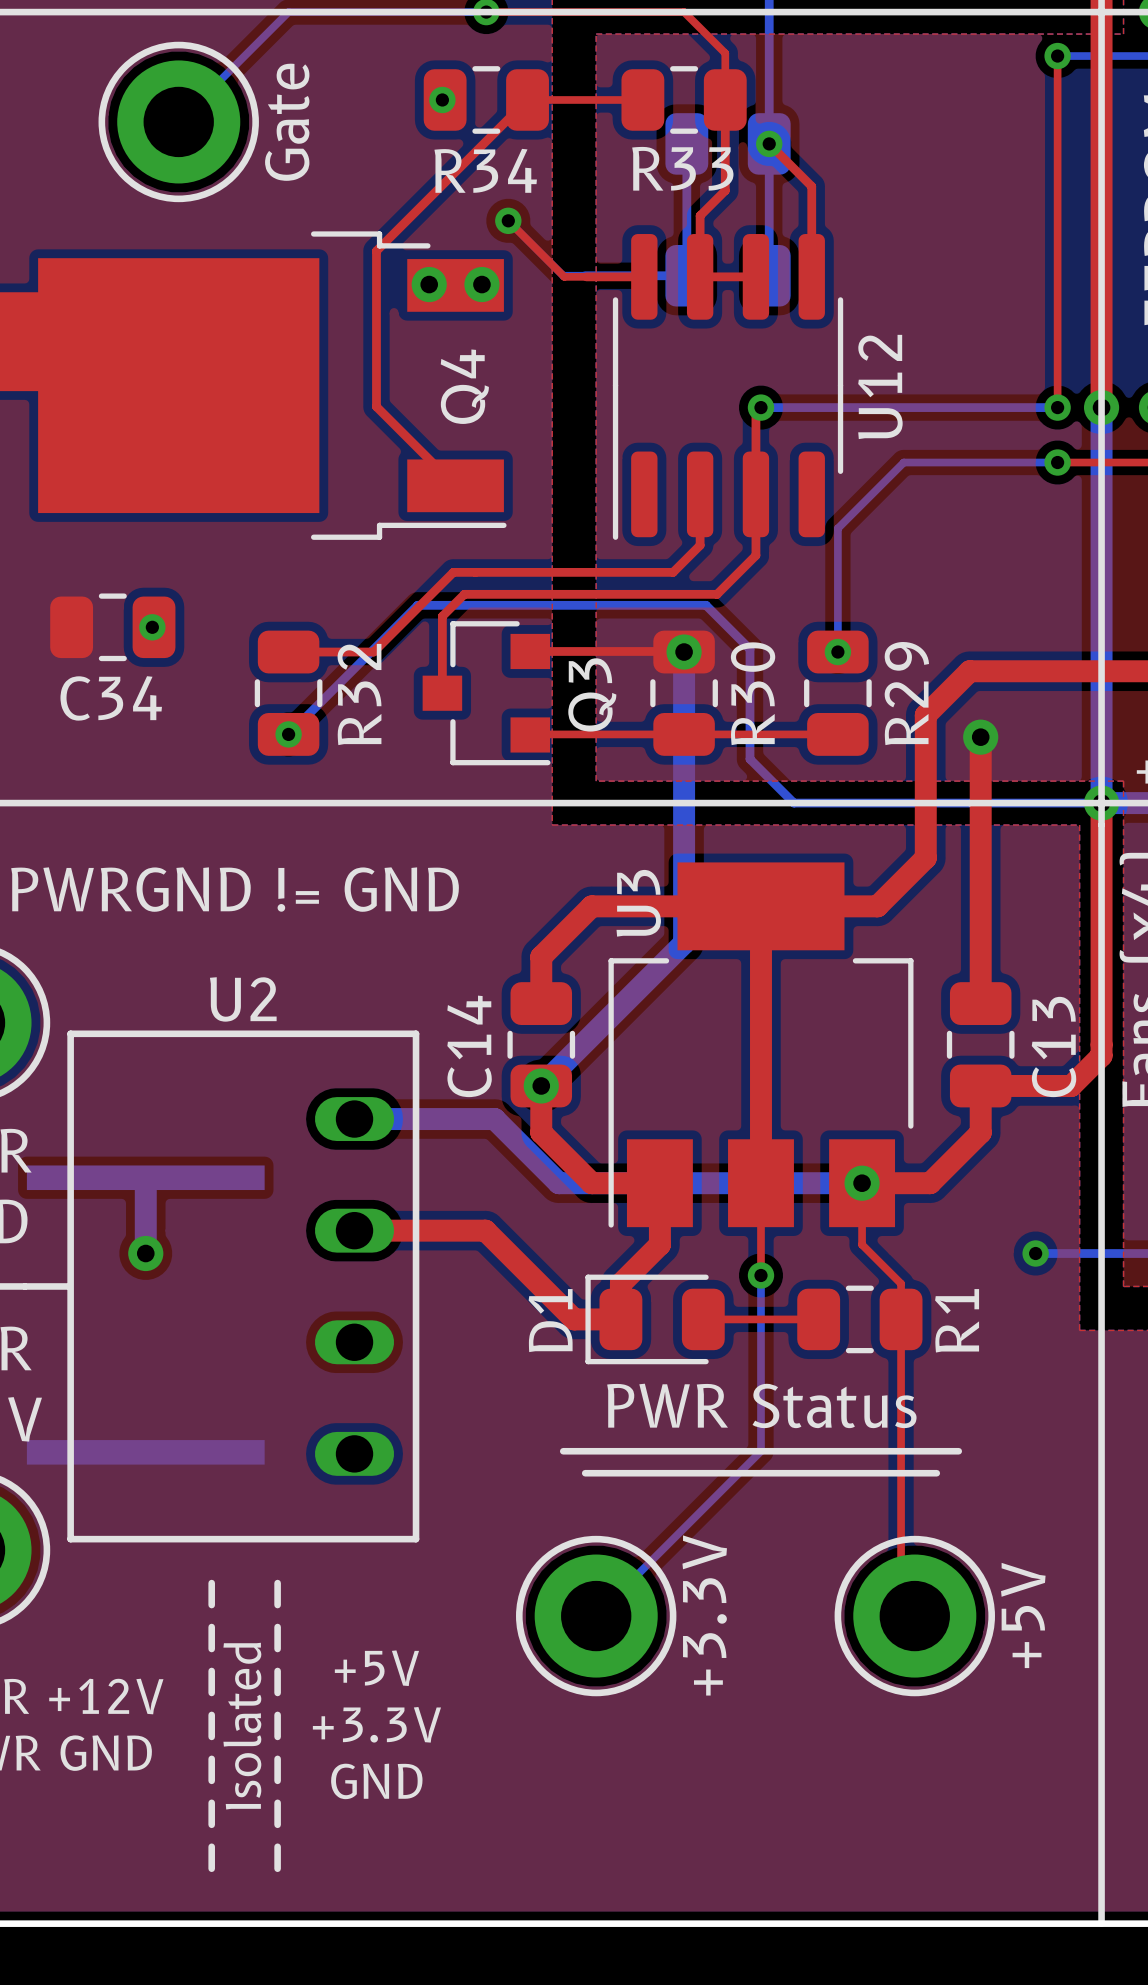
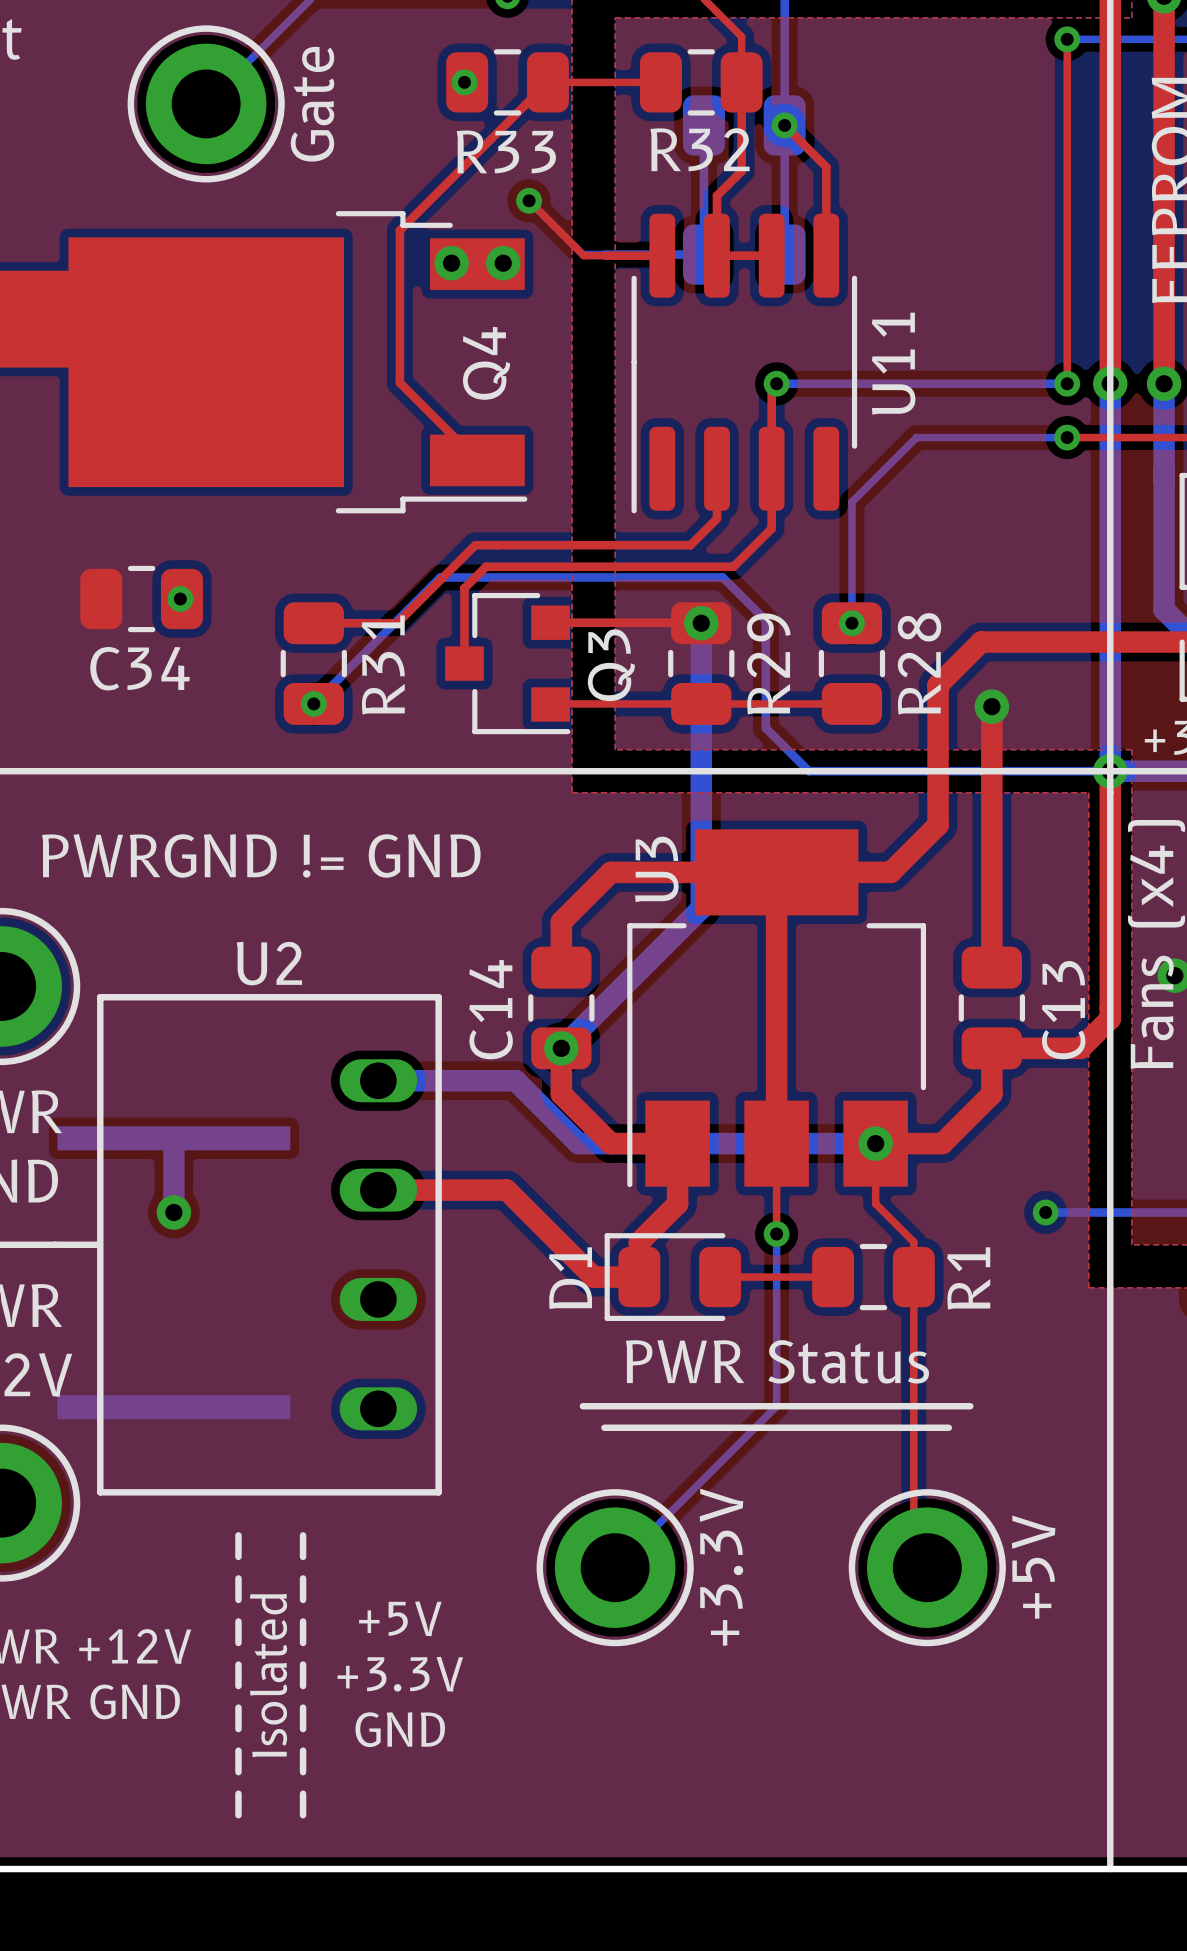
R33 name: R33 (682, 168) -> R32 (700, 149)
R34 name: R34 (485, 170) -> R33 (506, 151)
U12 name: U12 (880, 386) -> U11 (893, 363)
R30 name: R30 (753, 693) -> R29 (768, 663)
R29 name: R29 (906, 693) -> R28 (919, 663)
R32 name: R32 (359, 694) -> R31 (383, 664)

